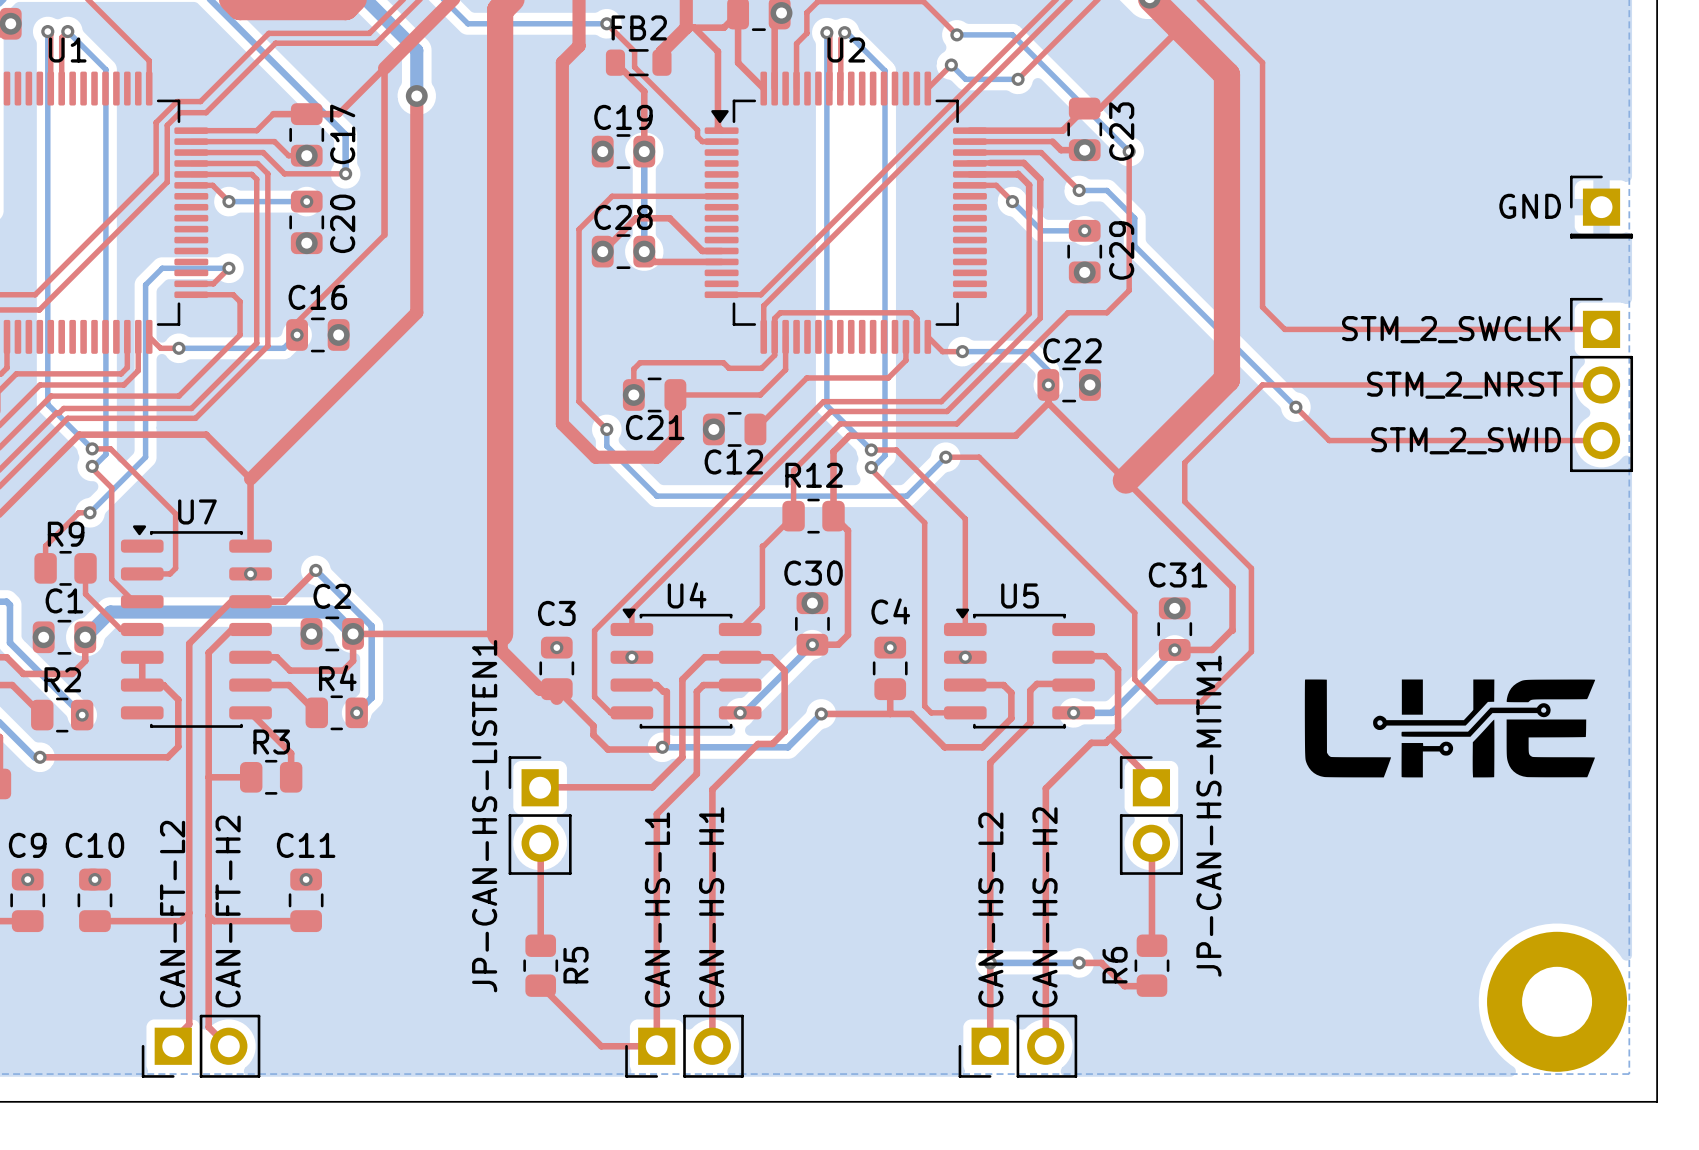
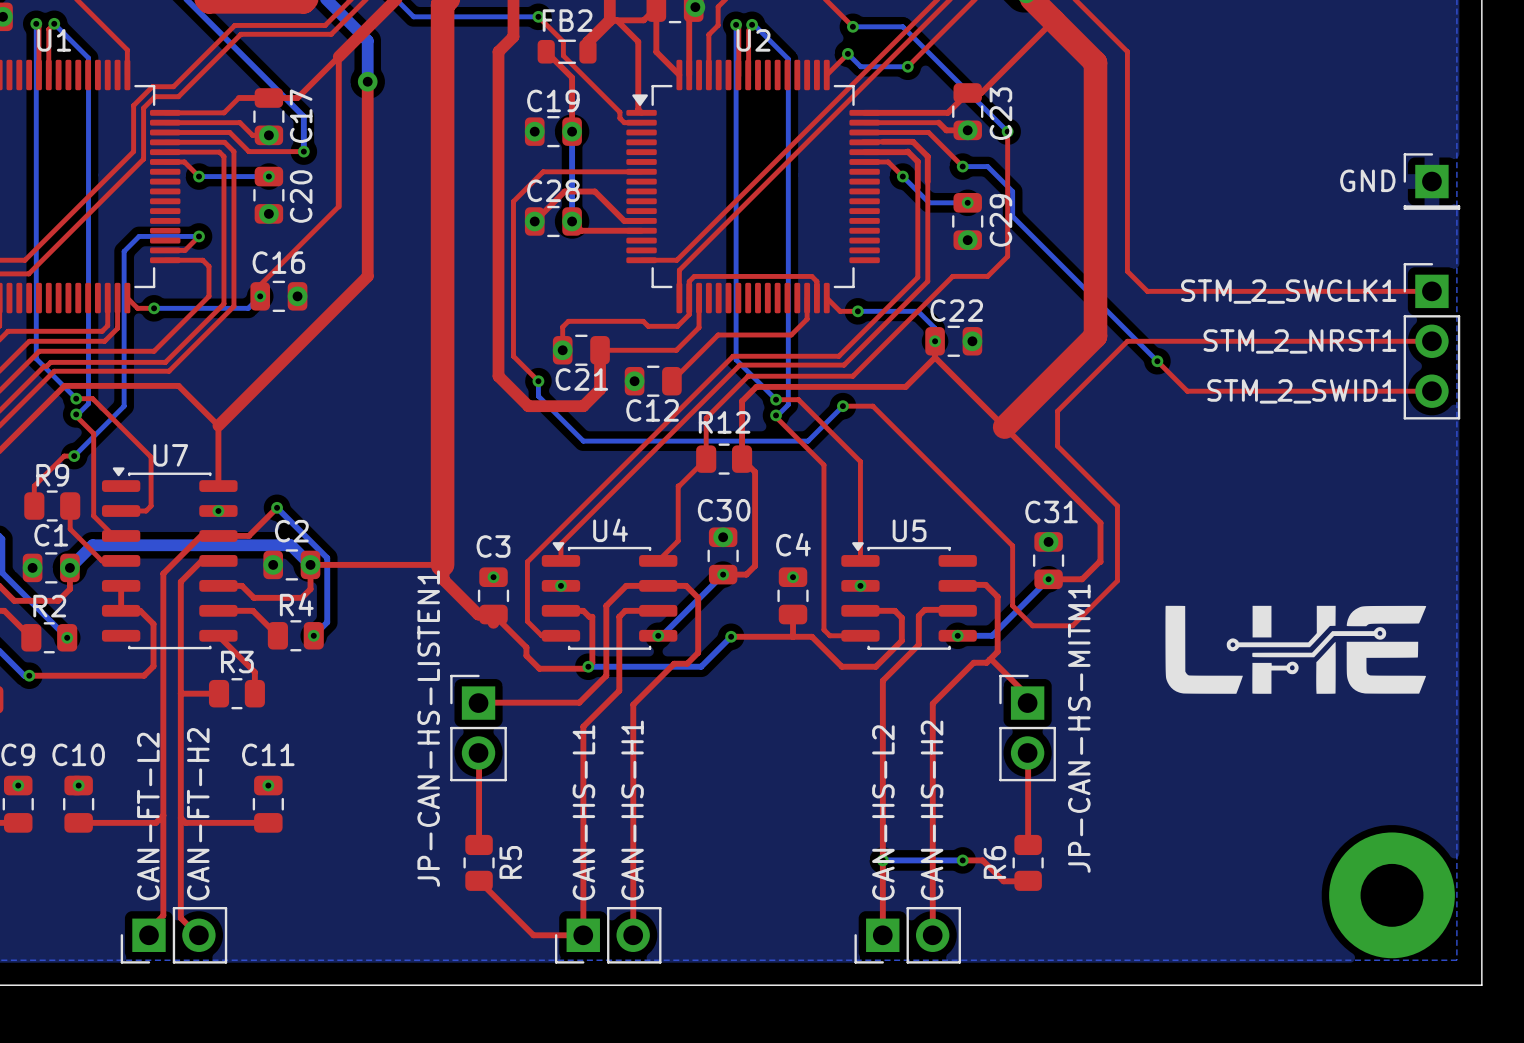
text: STM_2_SWCLK (1451, 329) -> STM_2_SWCLK1 (1288, 291)
text: STM_2_NRST (1465, 385) -> STM_2_NRST1 (1299, 341)
text: STM_2_SWID (1466, 440) -> STM_2_SWID1 (1301, 391)

